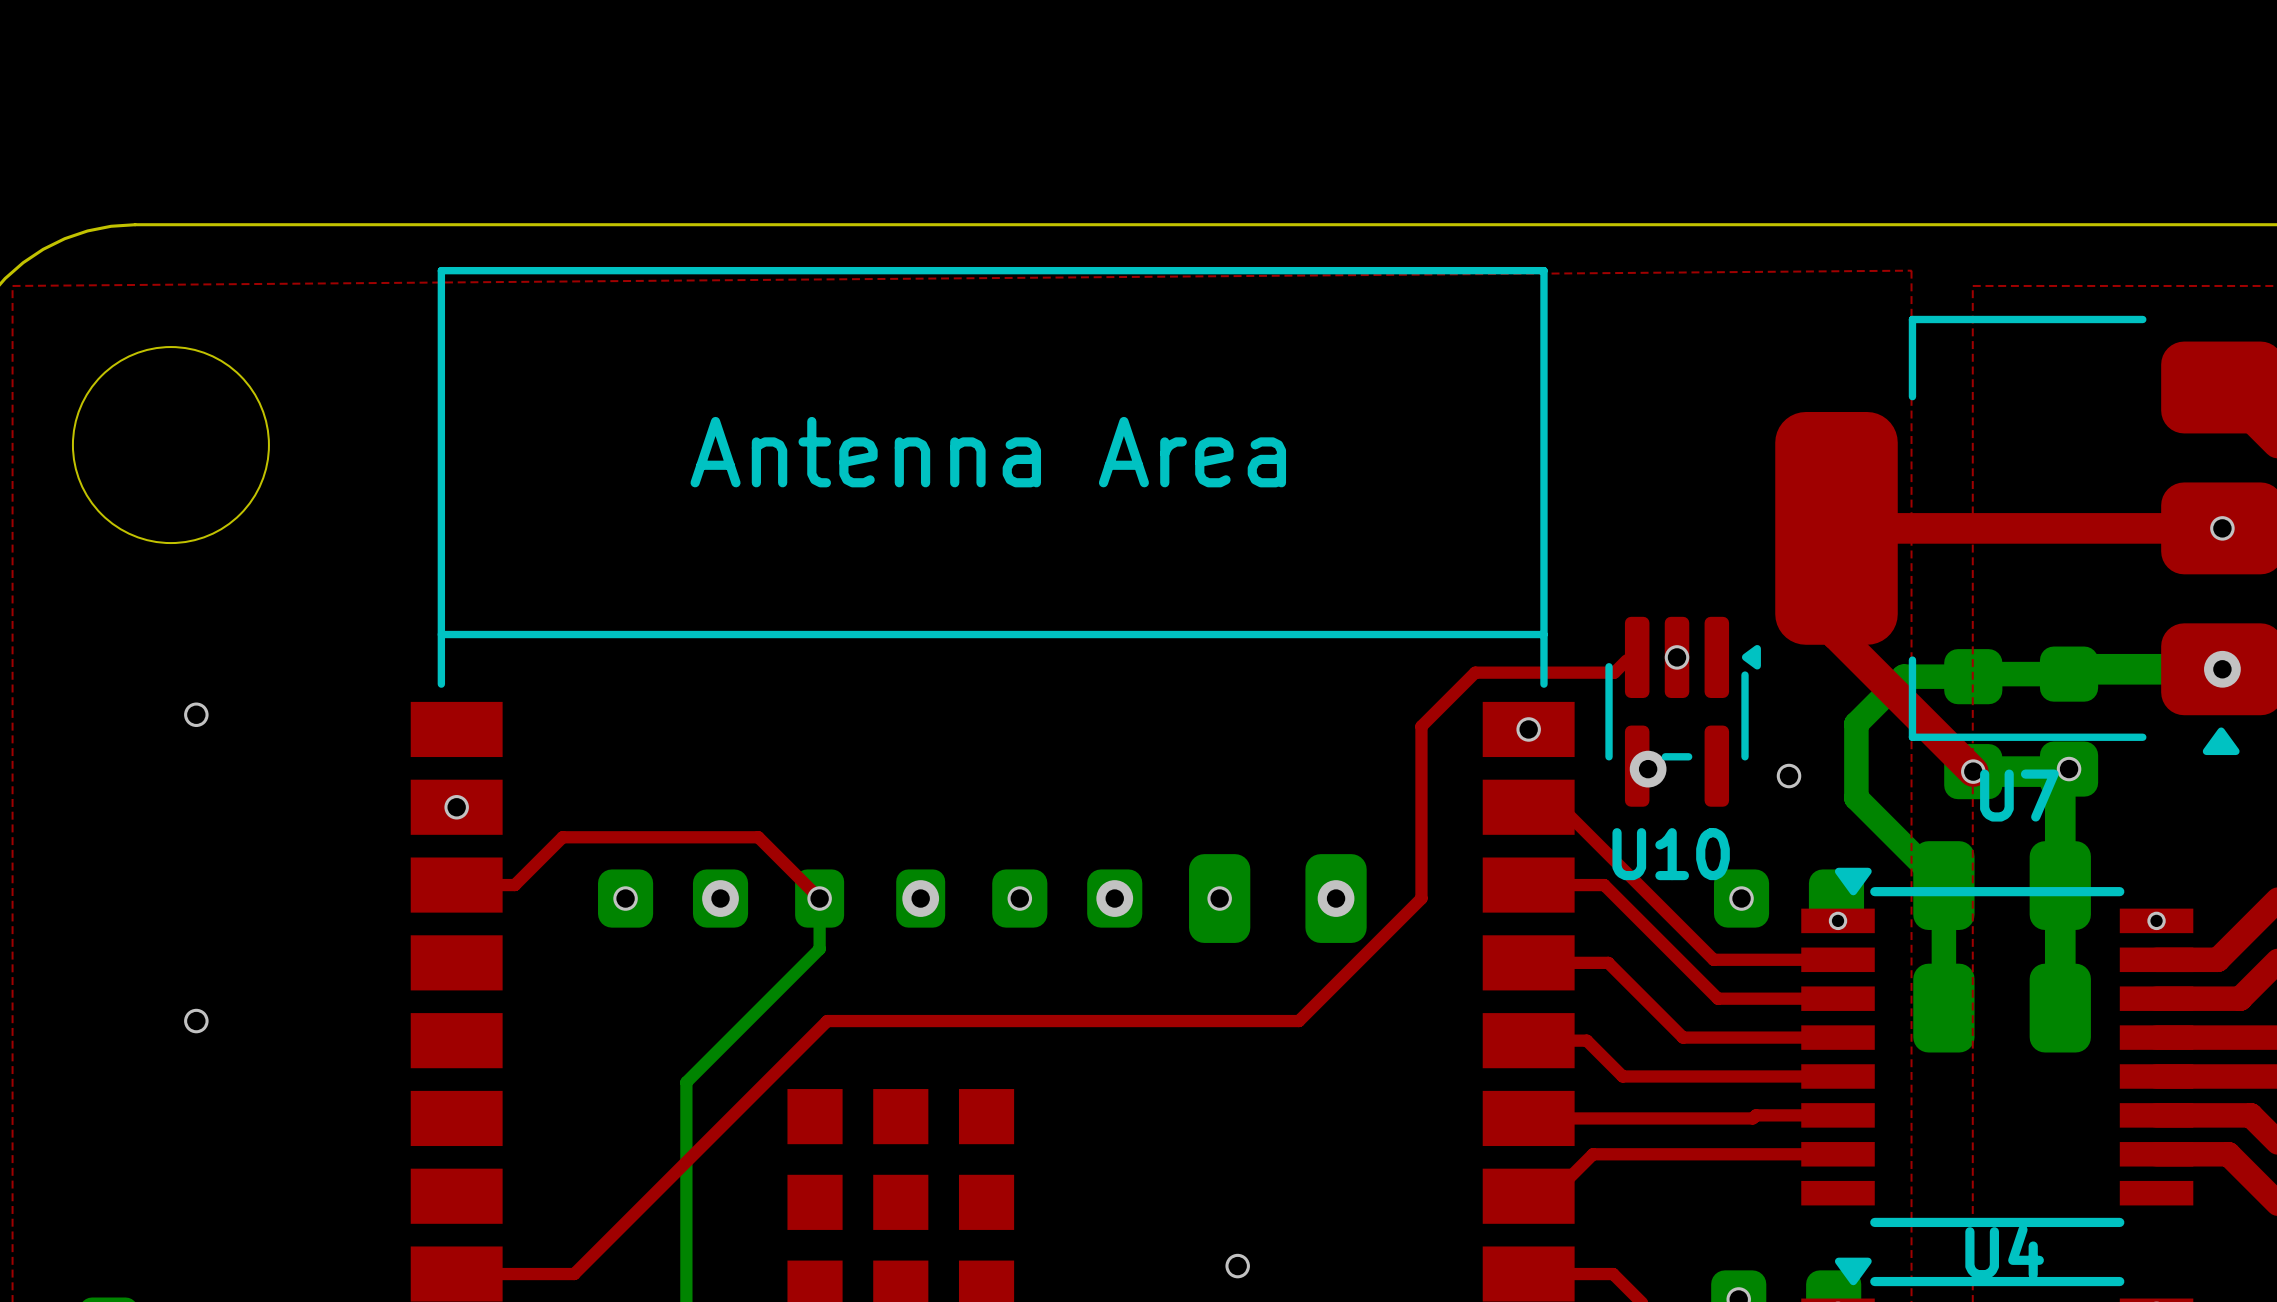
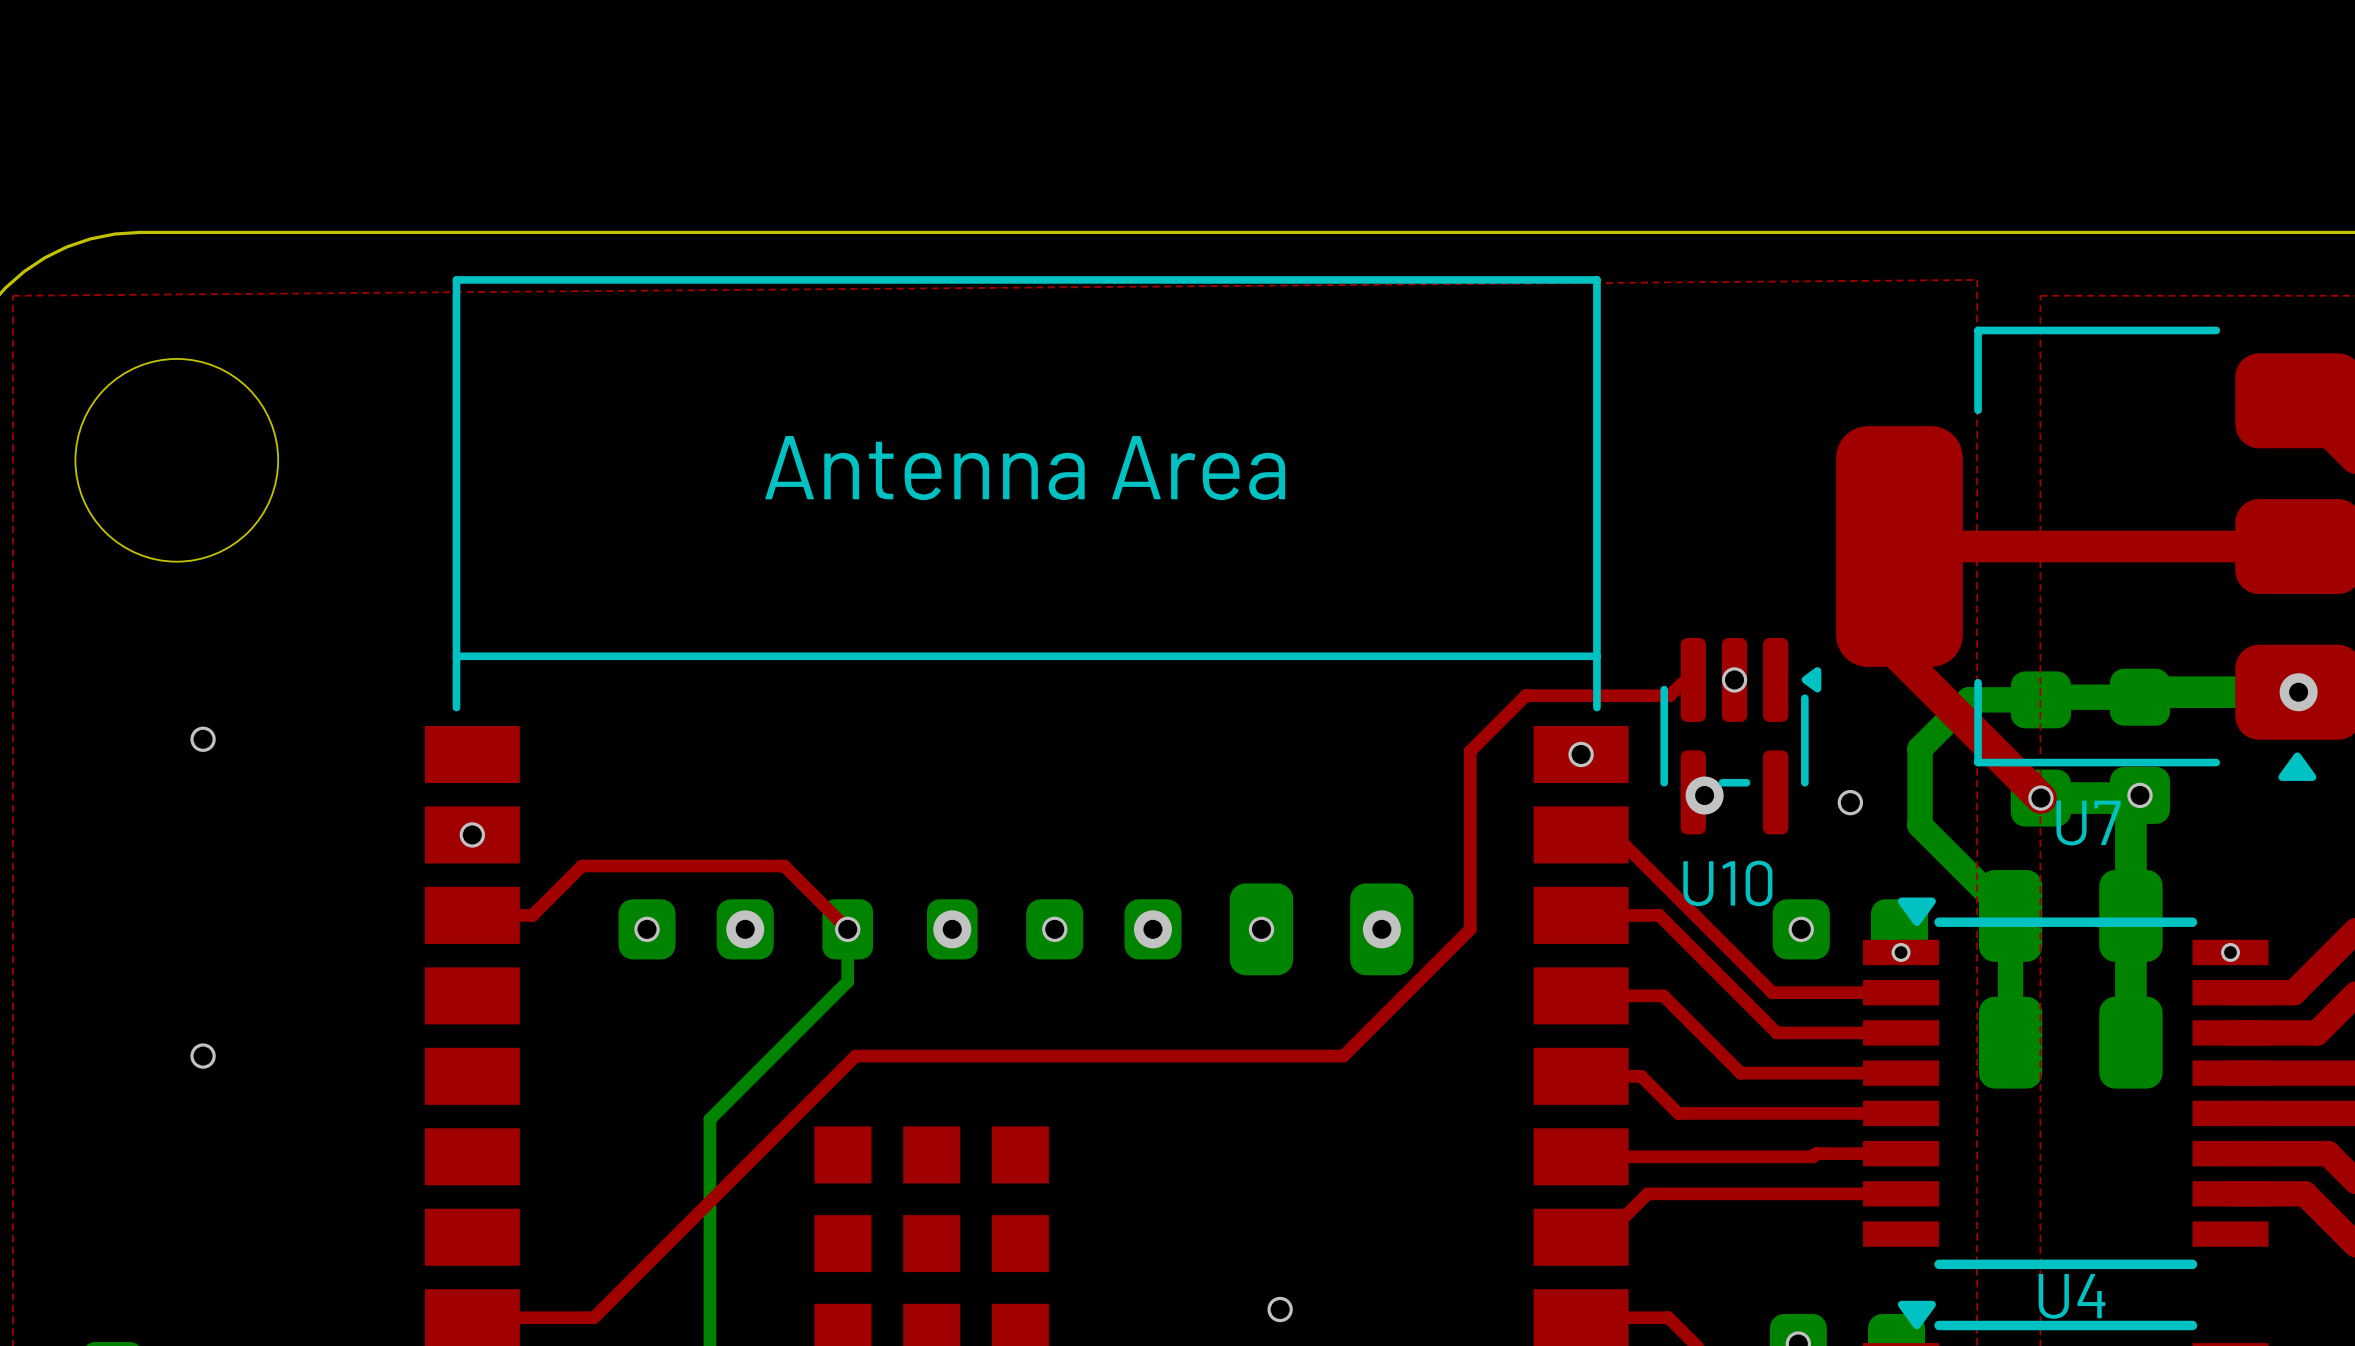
via: (2222, 528) -> none

